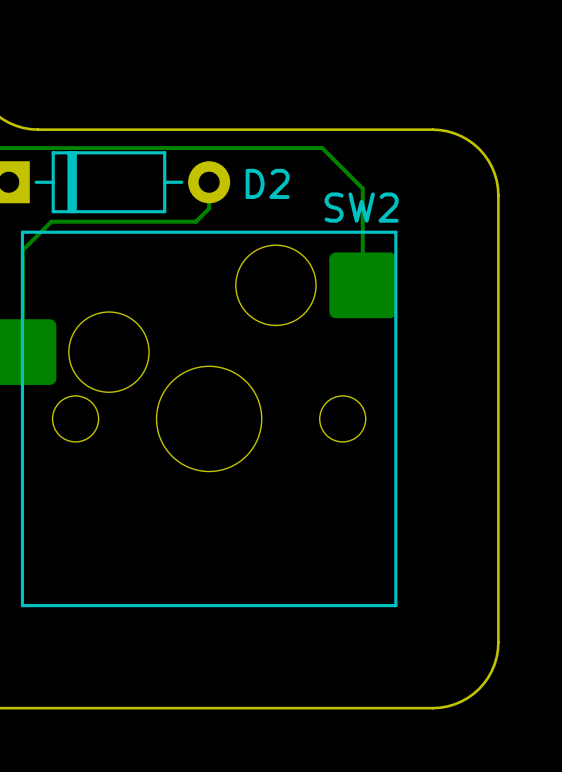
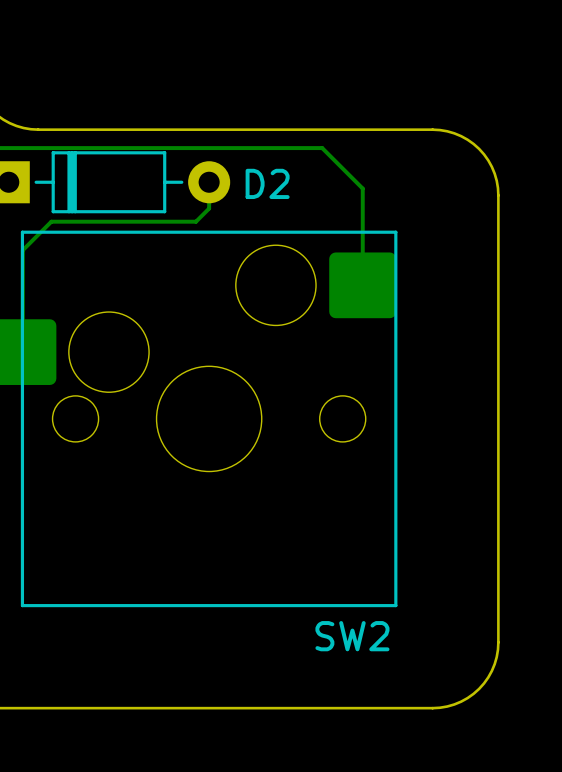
SW2 name position: SW2 (361, 207) -> SW2 (352, 636)

